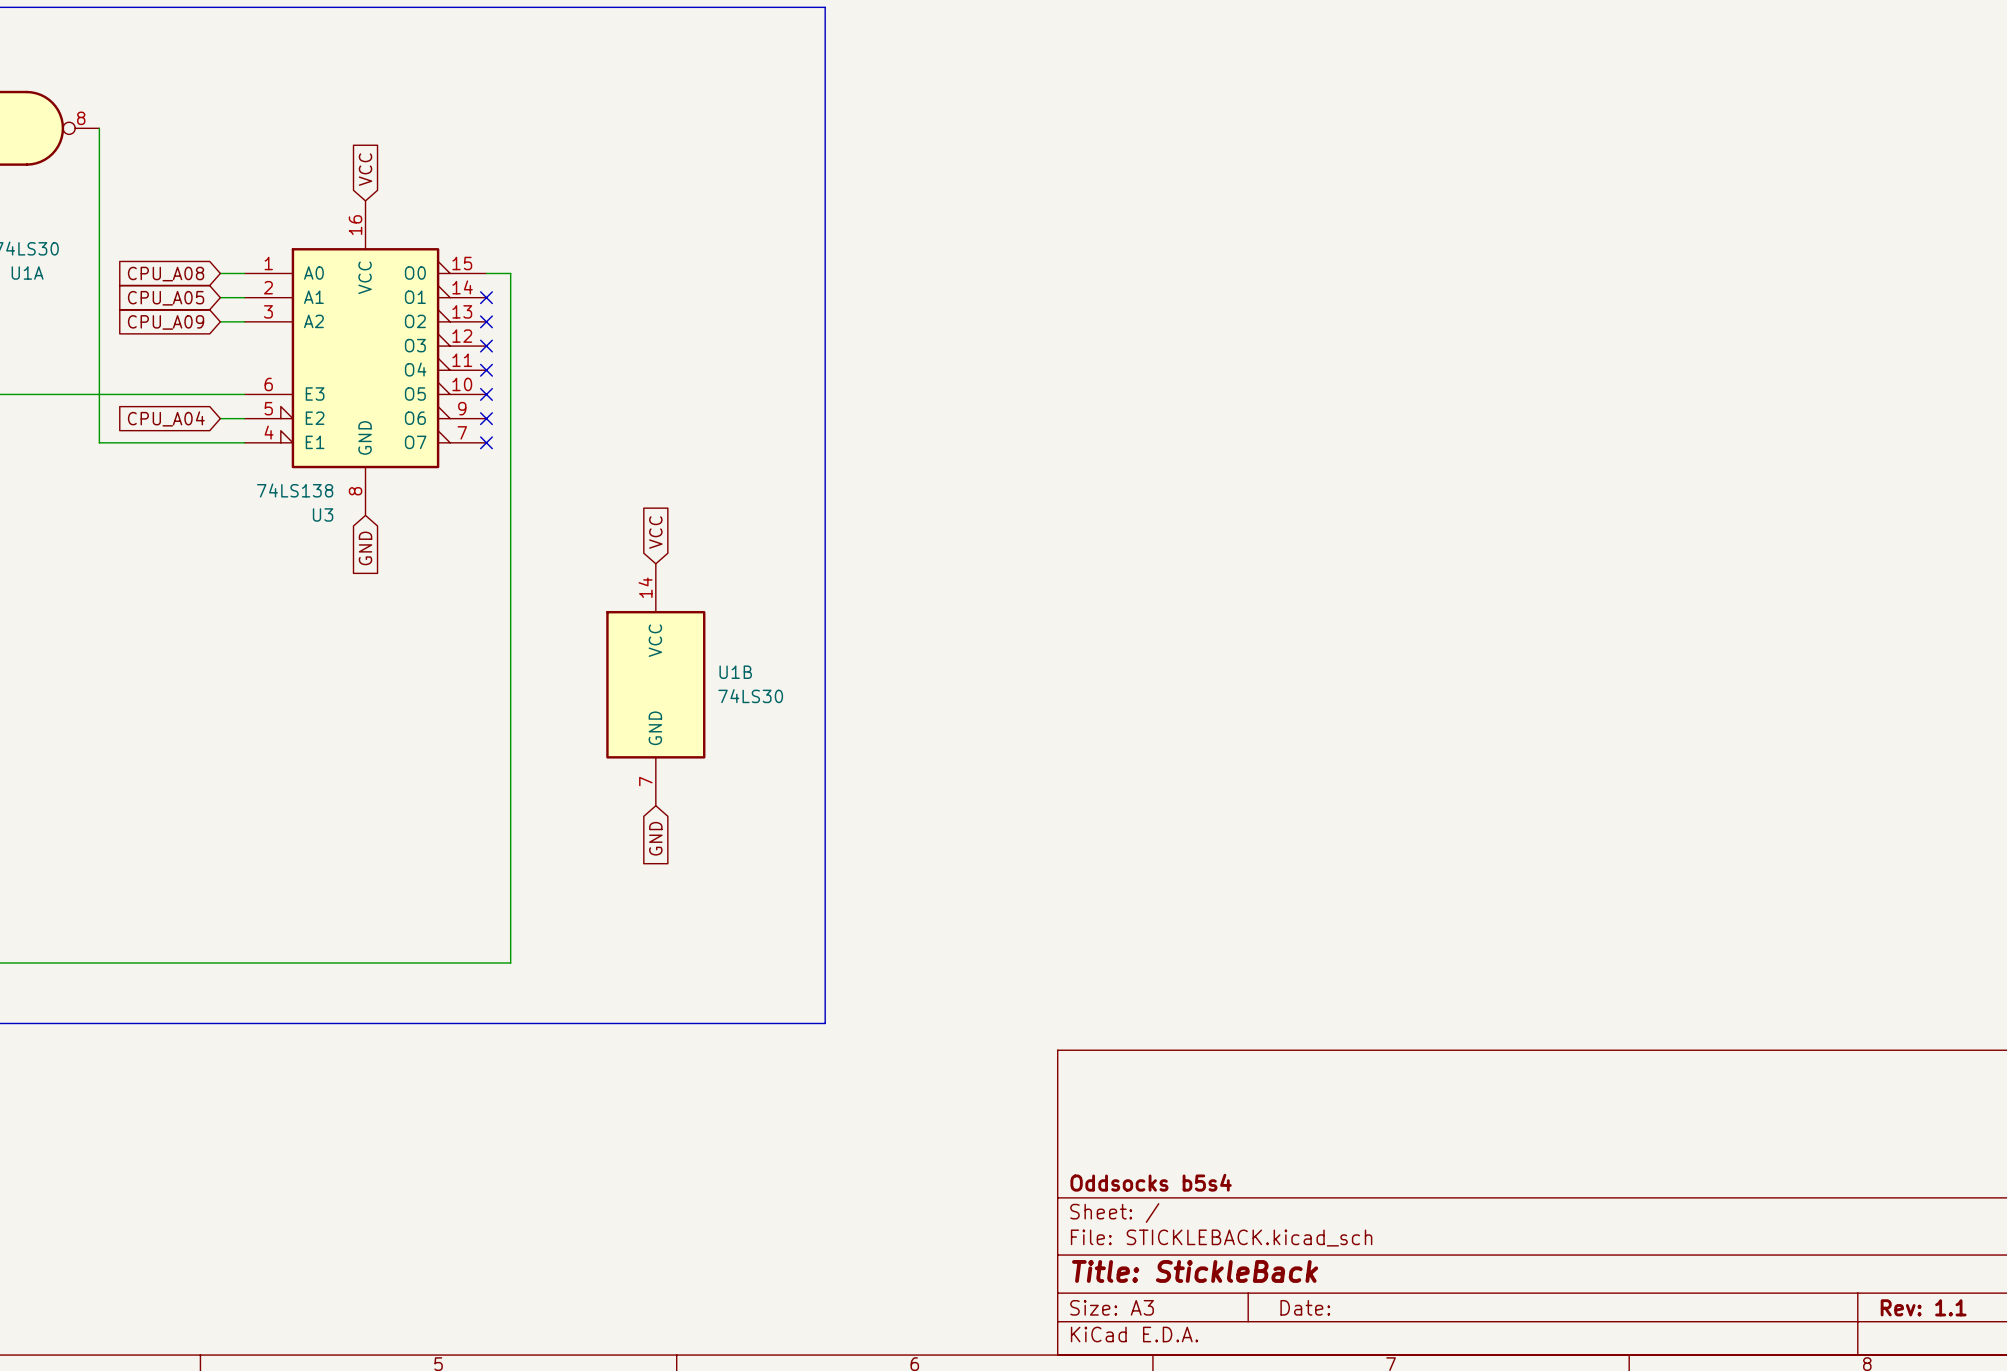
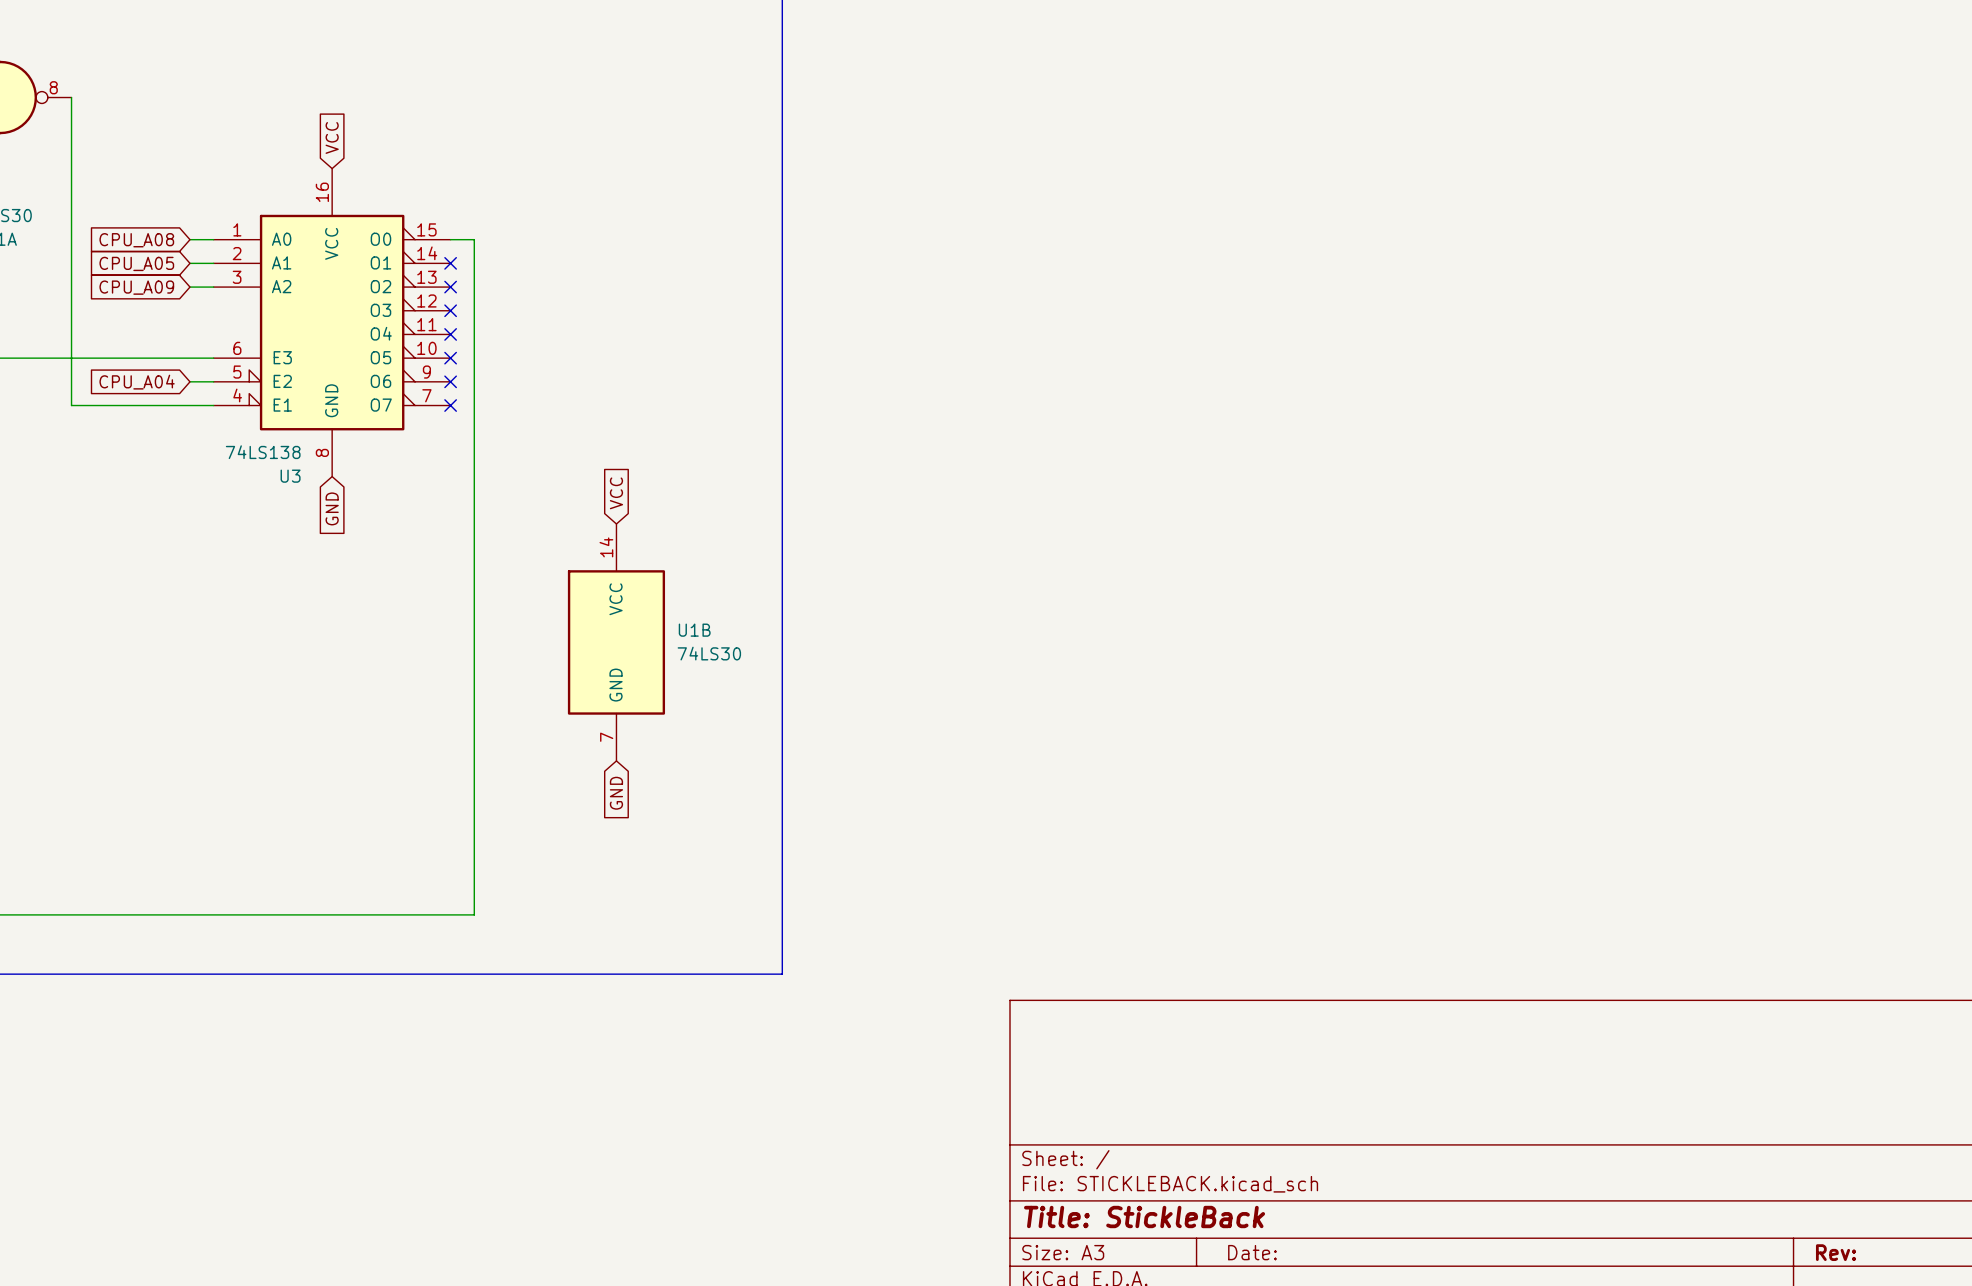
title block: Oddsocks b5s4 (1151, 1182) -> none
title block: Rev: 1.1 (1923, 1307) -> Rev: (1836, 1252)

